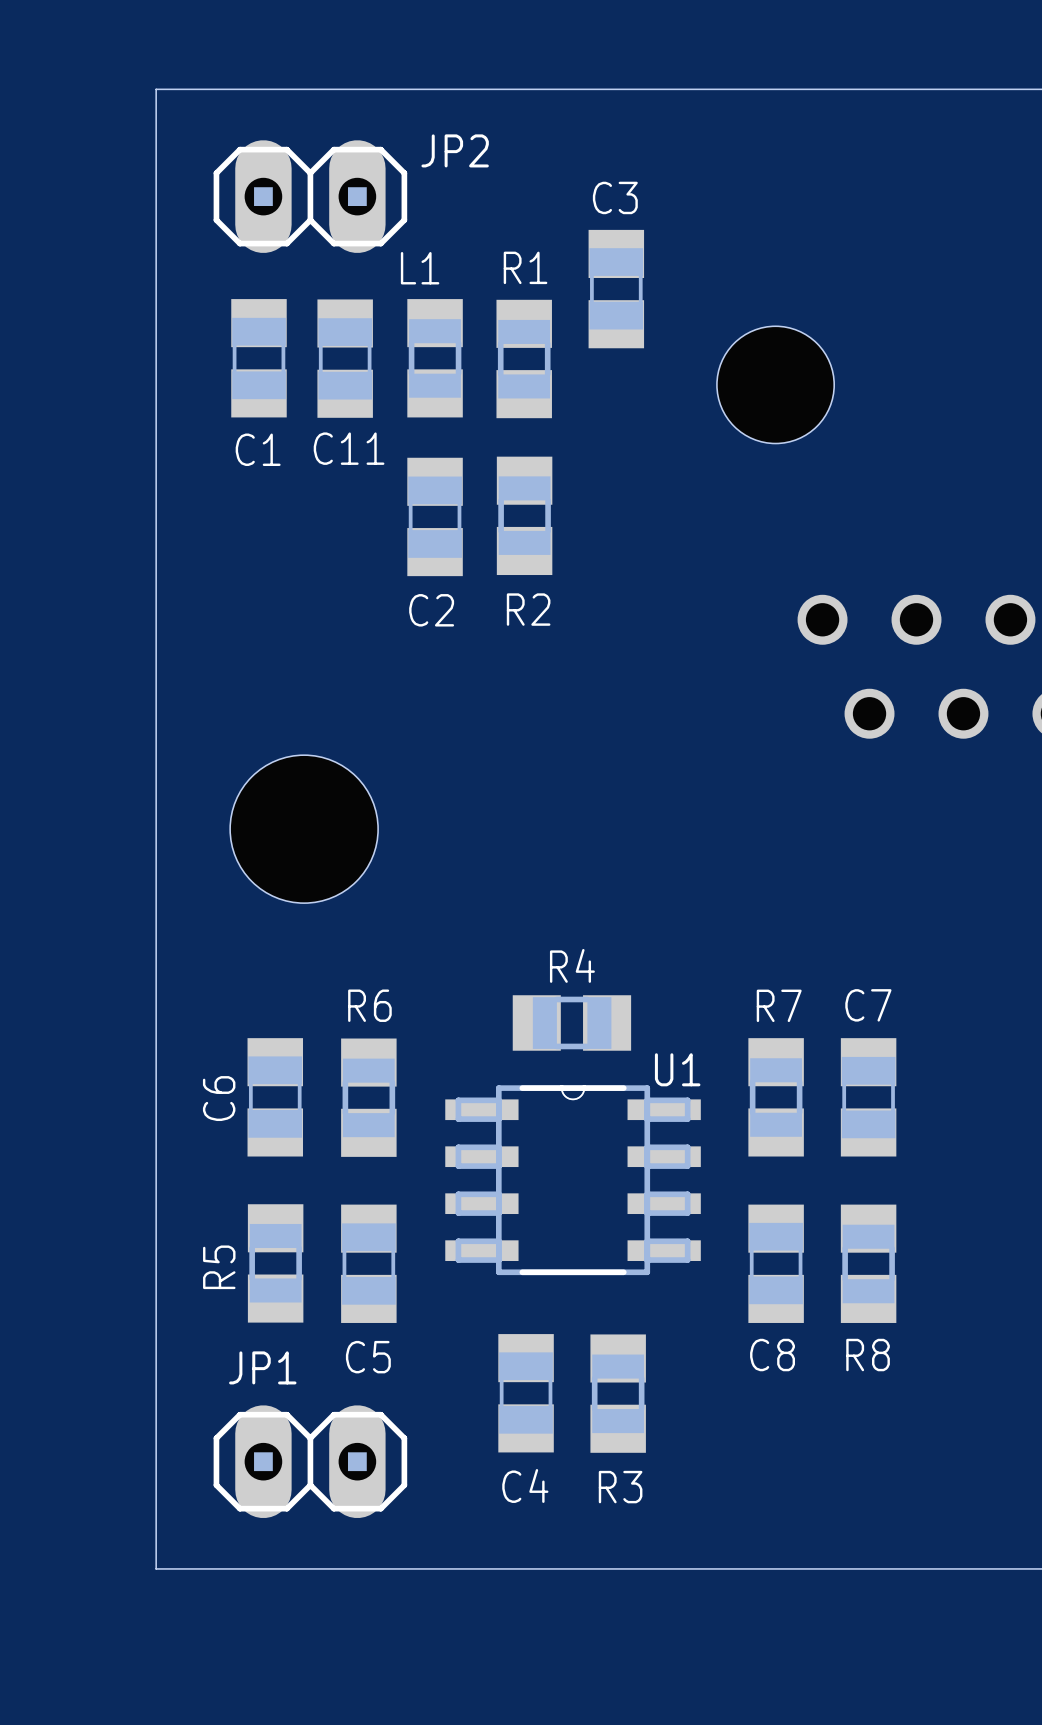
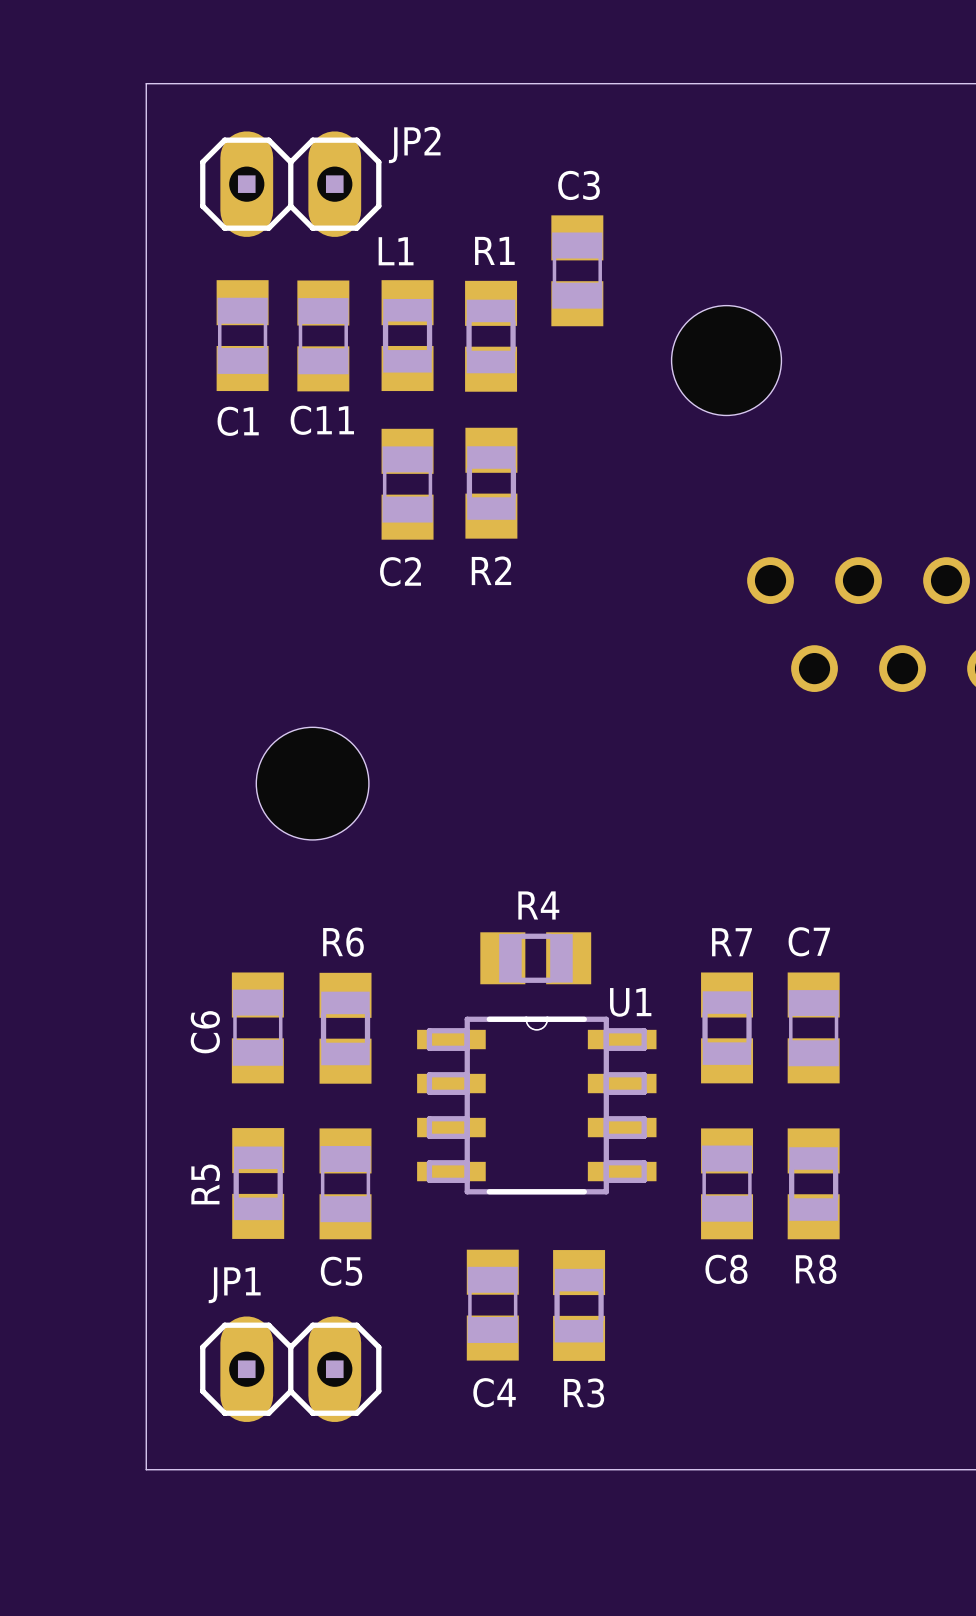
hole size: [230, 755, 379, 904] -> [256, 727, 369, 840]

